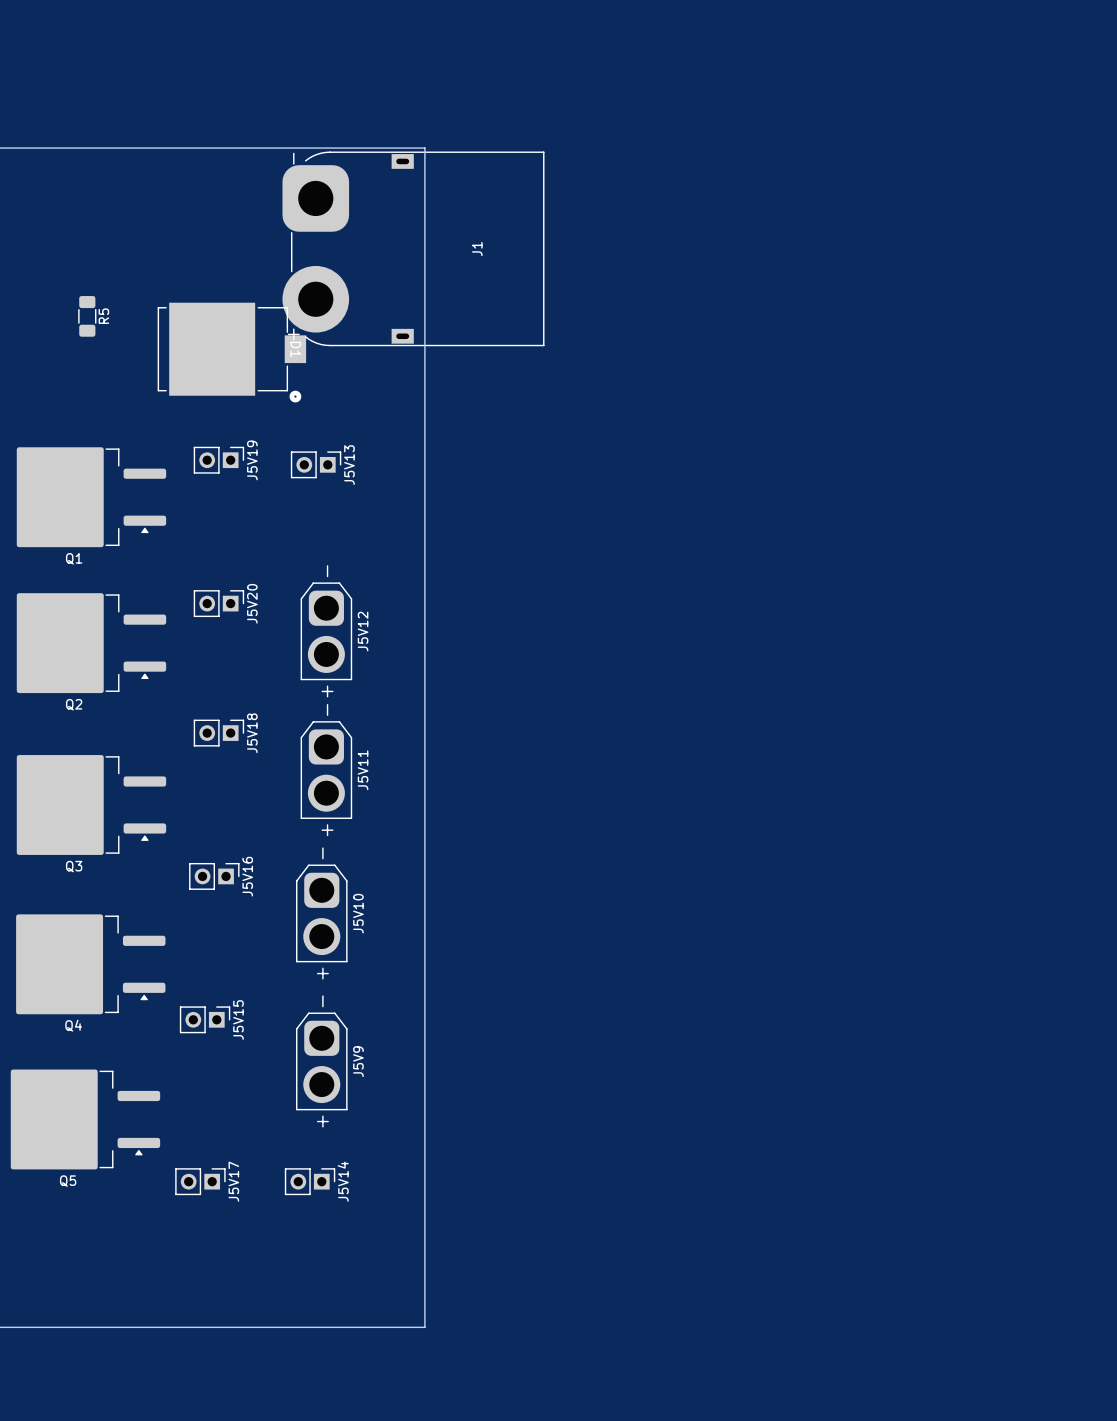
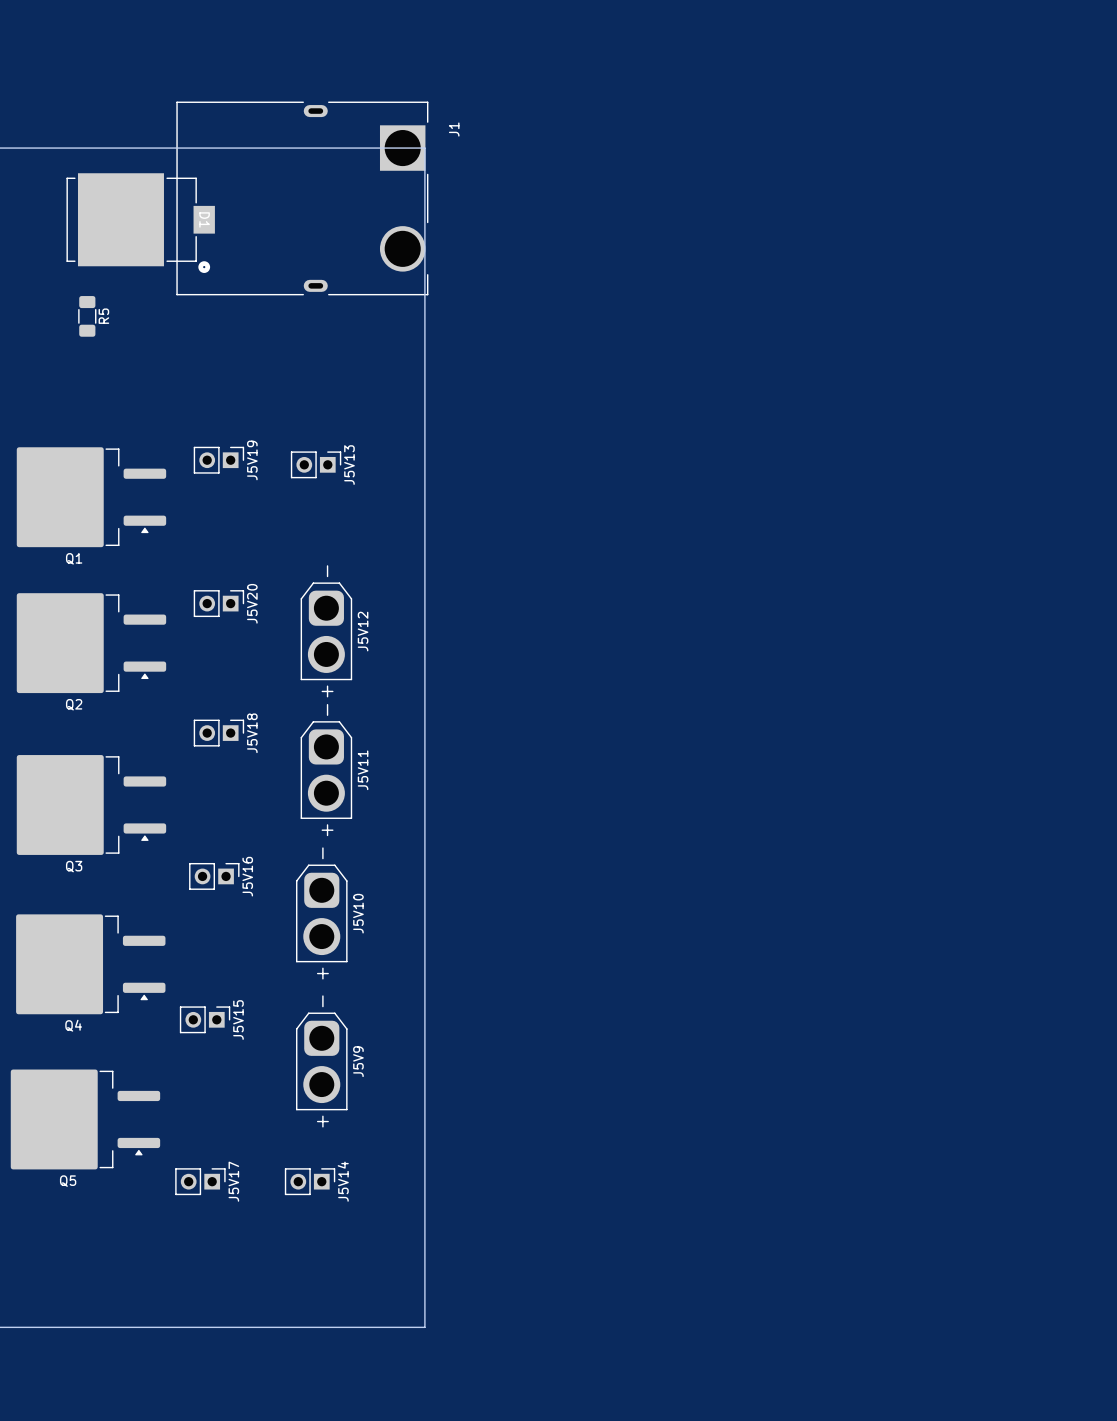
J1 footprint: [282, 151, 545, 347] -> [176, 101, 429, 296]
J1 name position: J1 (477, 249) -> J1 (454, 129)
part position: (231, 352) -> (140, 223)

